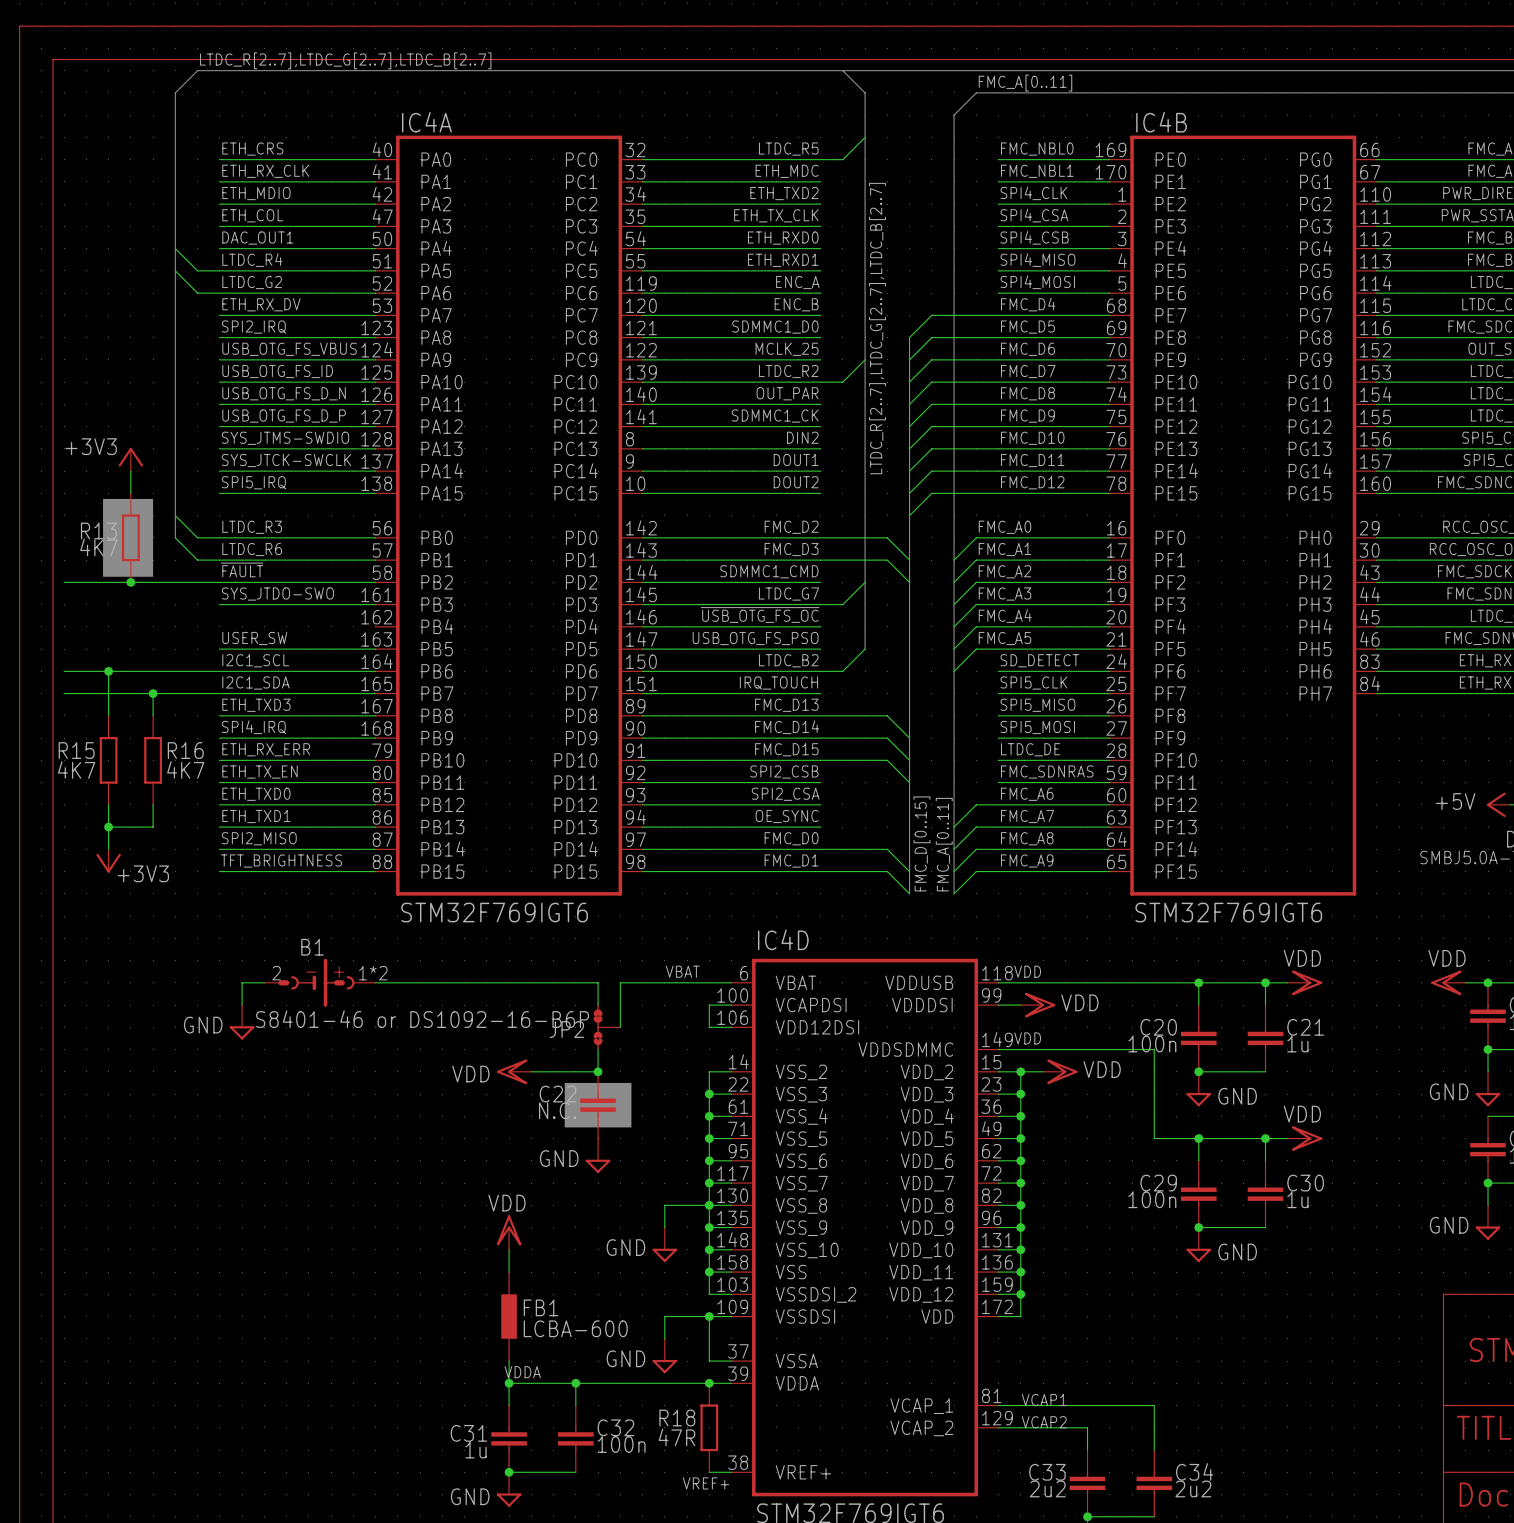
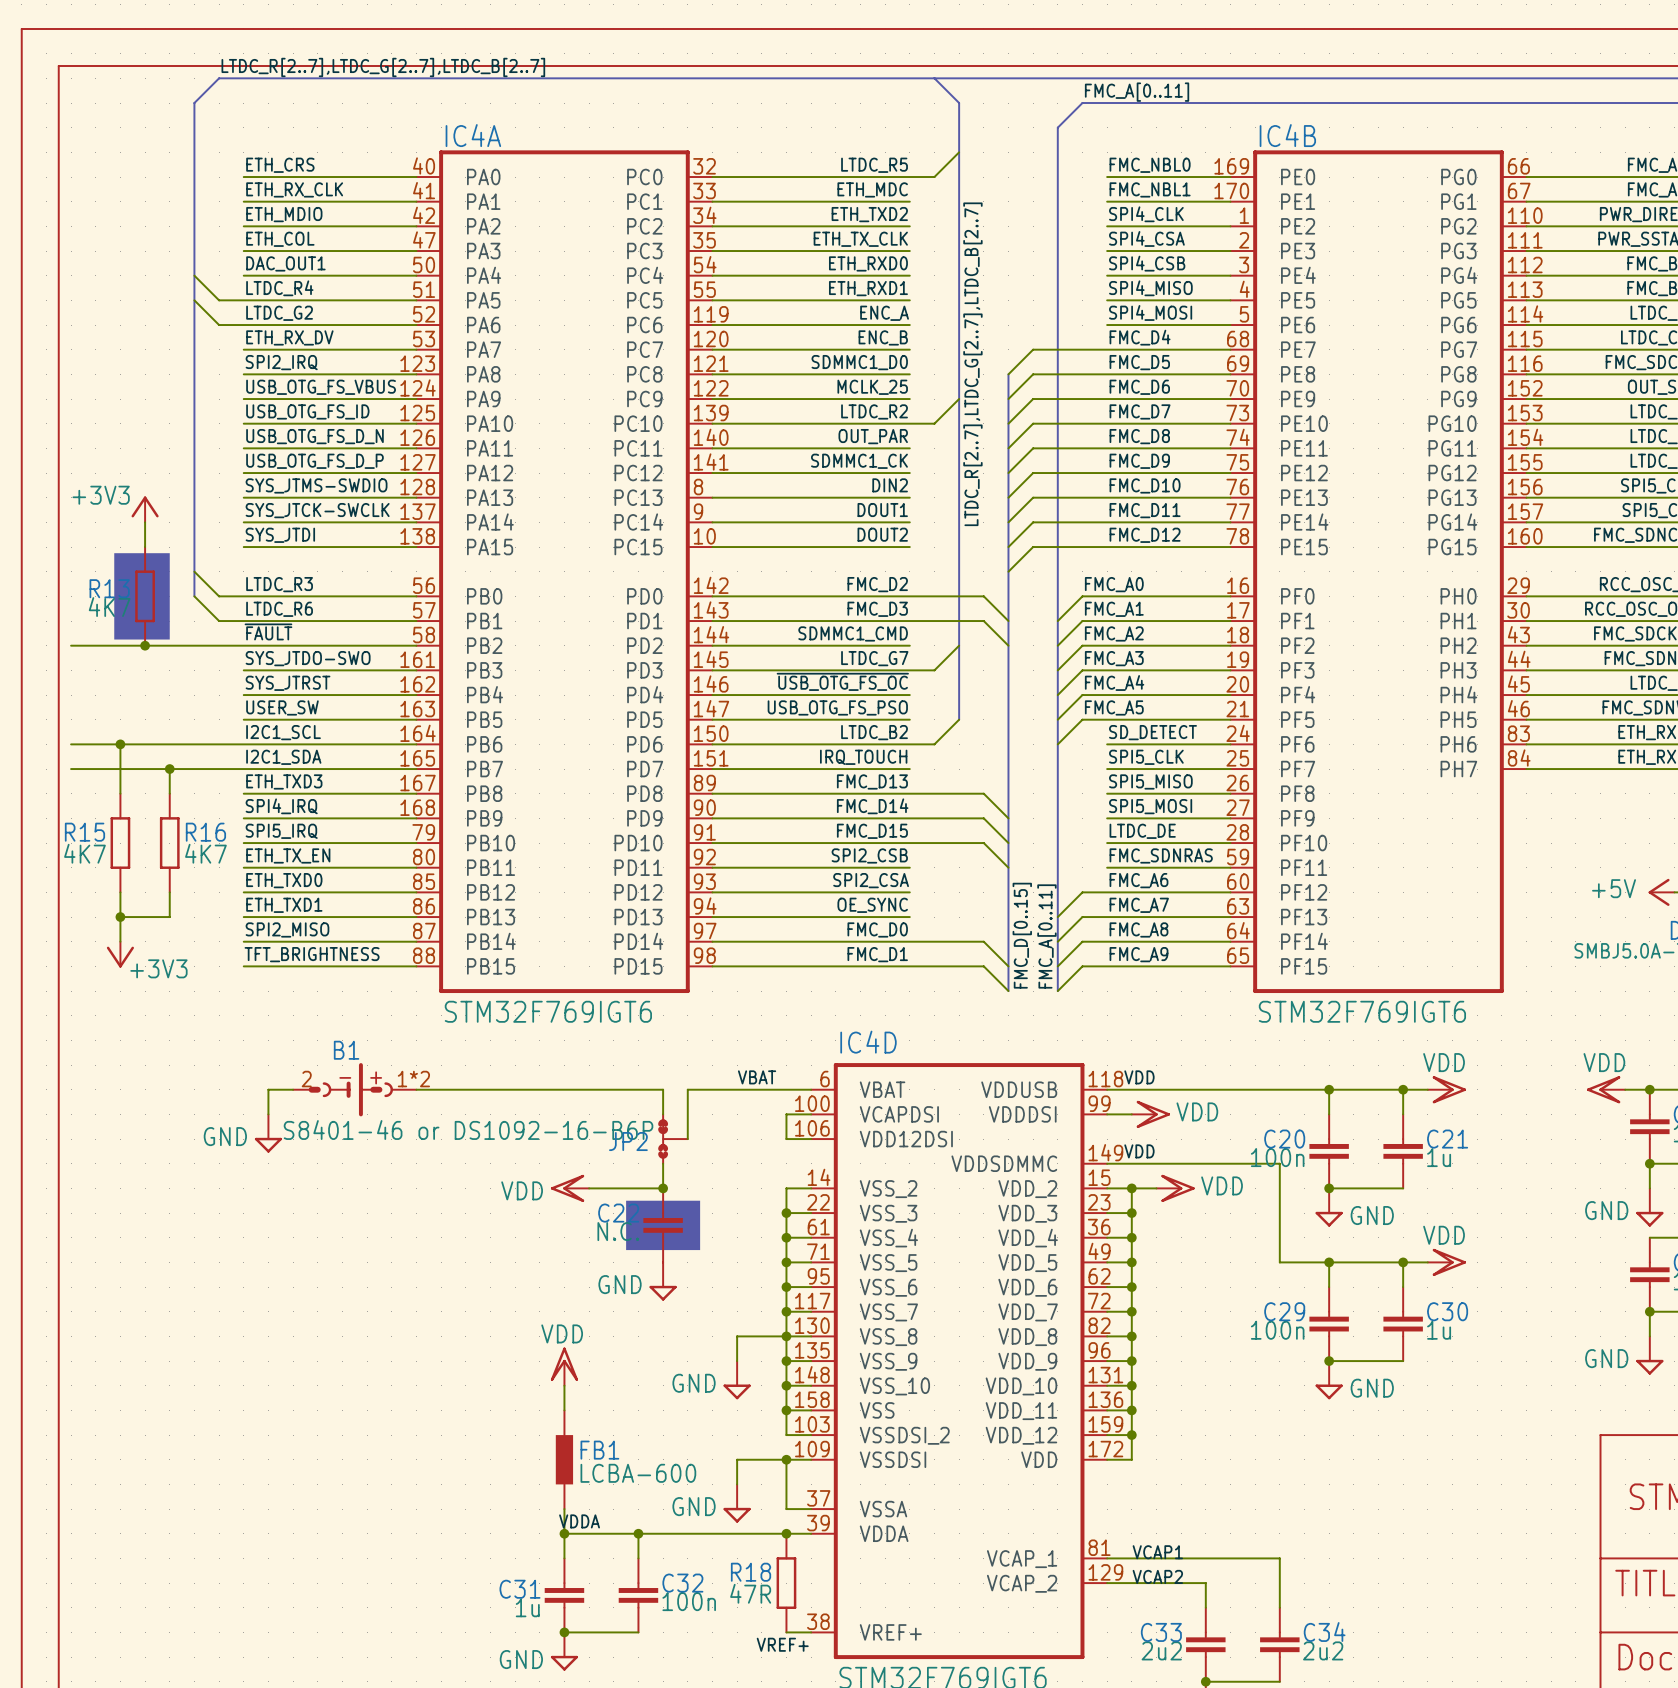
label: SPI5_IRQ (254, 482) -> SYS_JTDI (280, 535)
label: none -> SYS_JTRST (288, 683)
wire: none -> (243, 695) (416, 695)
label: ETH_RX_ERR (266, 749) -> SPI5_IRQ (281, 831)

